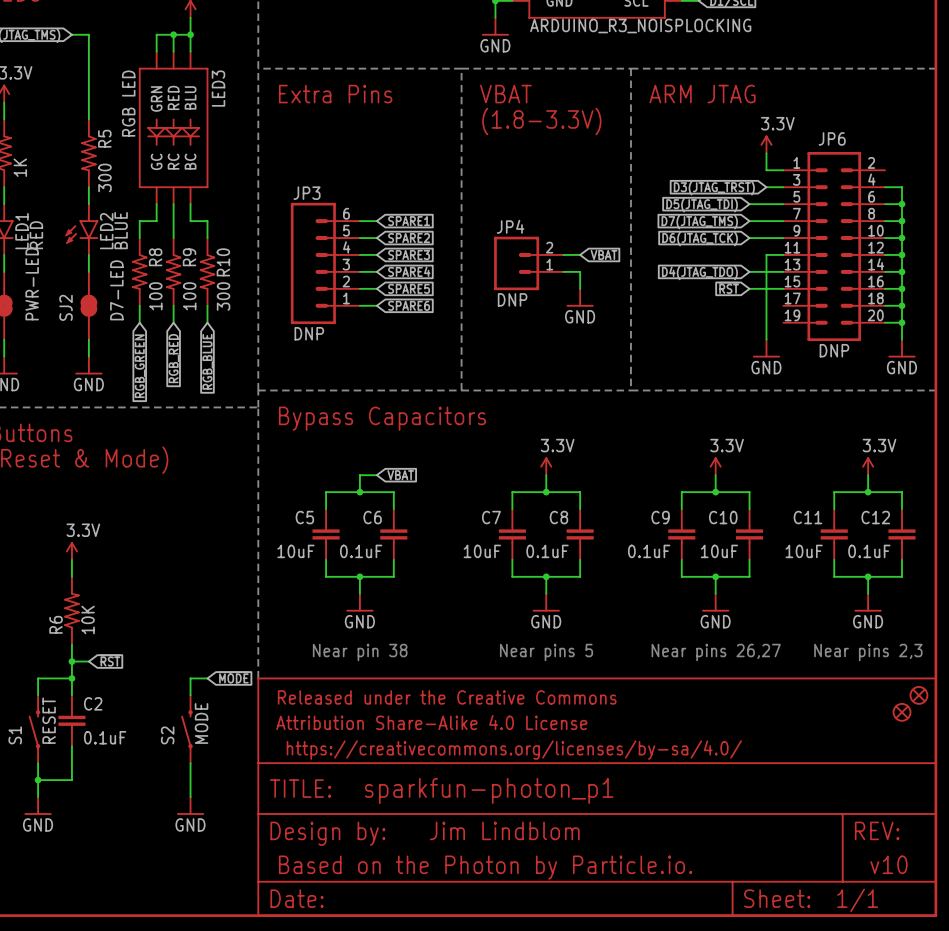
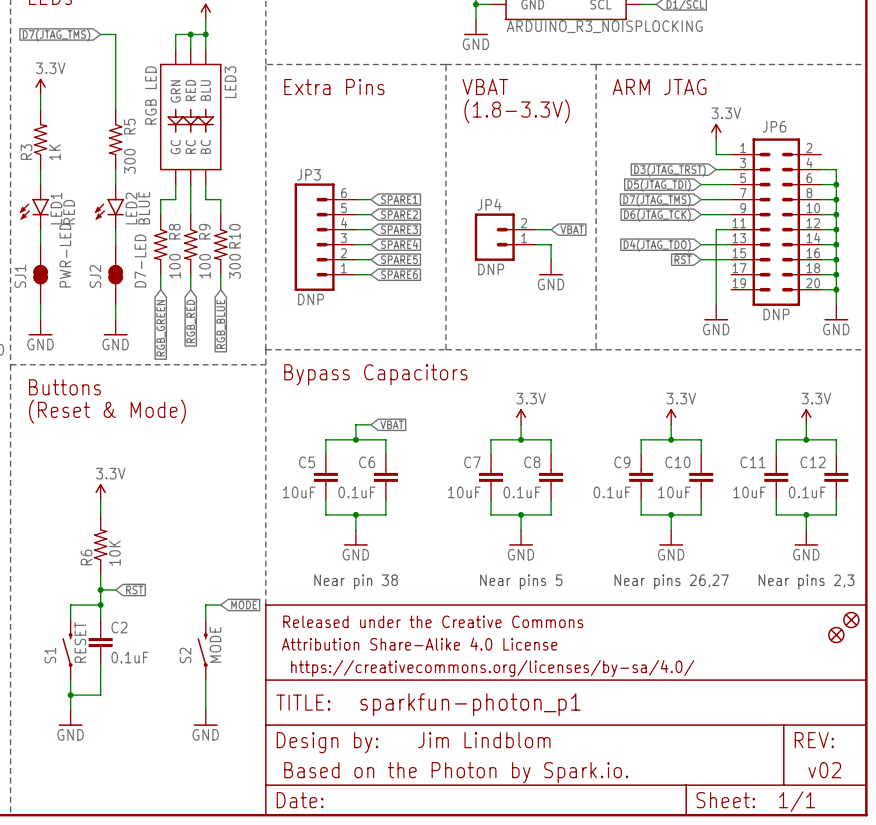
text: v10 (888, 864) -> v02 (824, 770)
text: Based on the Photon by Particle.io. (485, 867) -> Based on the Photon by Spark.io. (456, 772)

